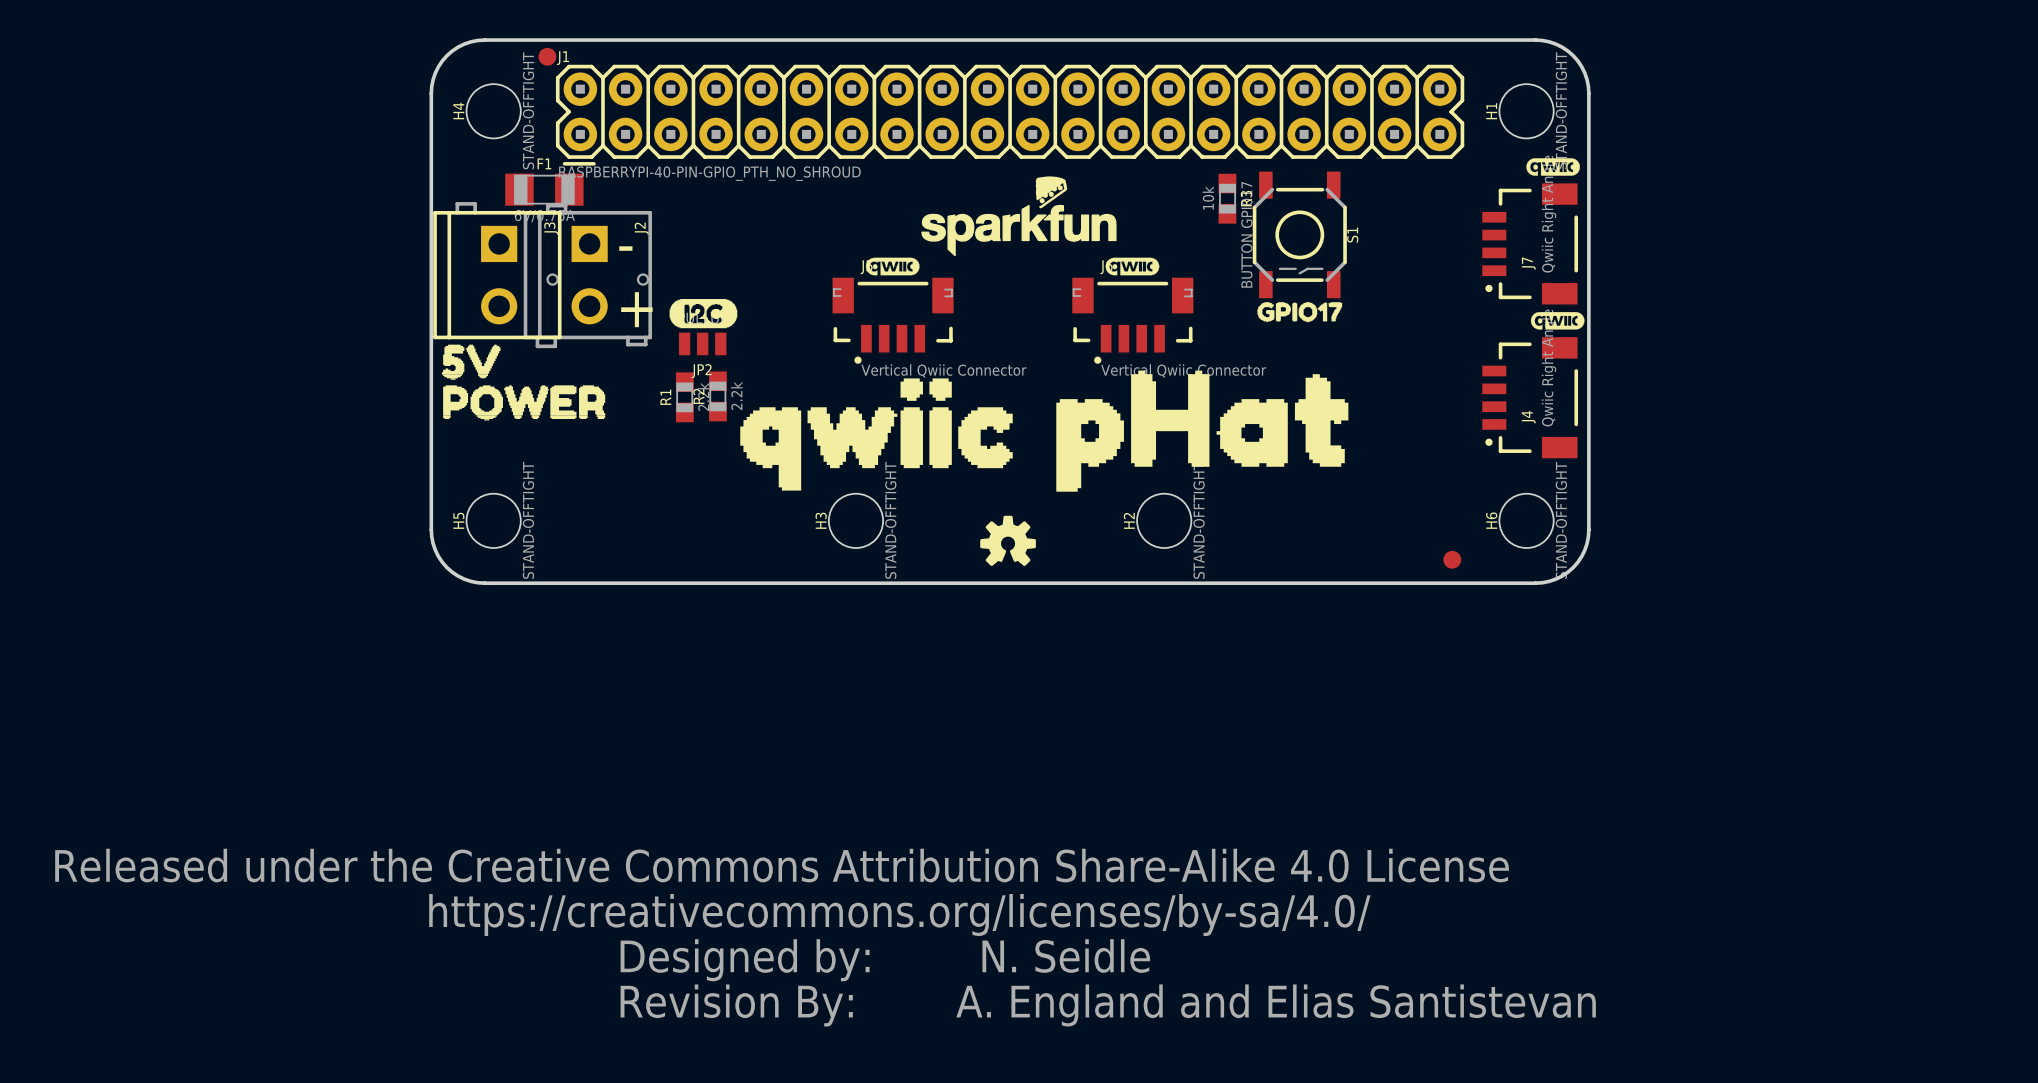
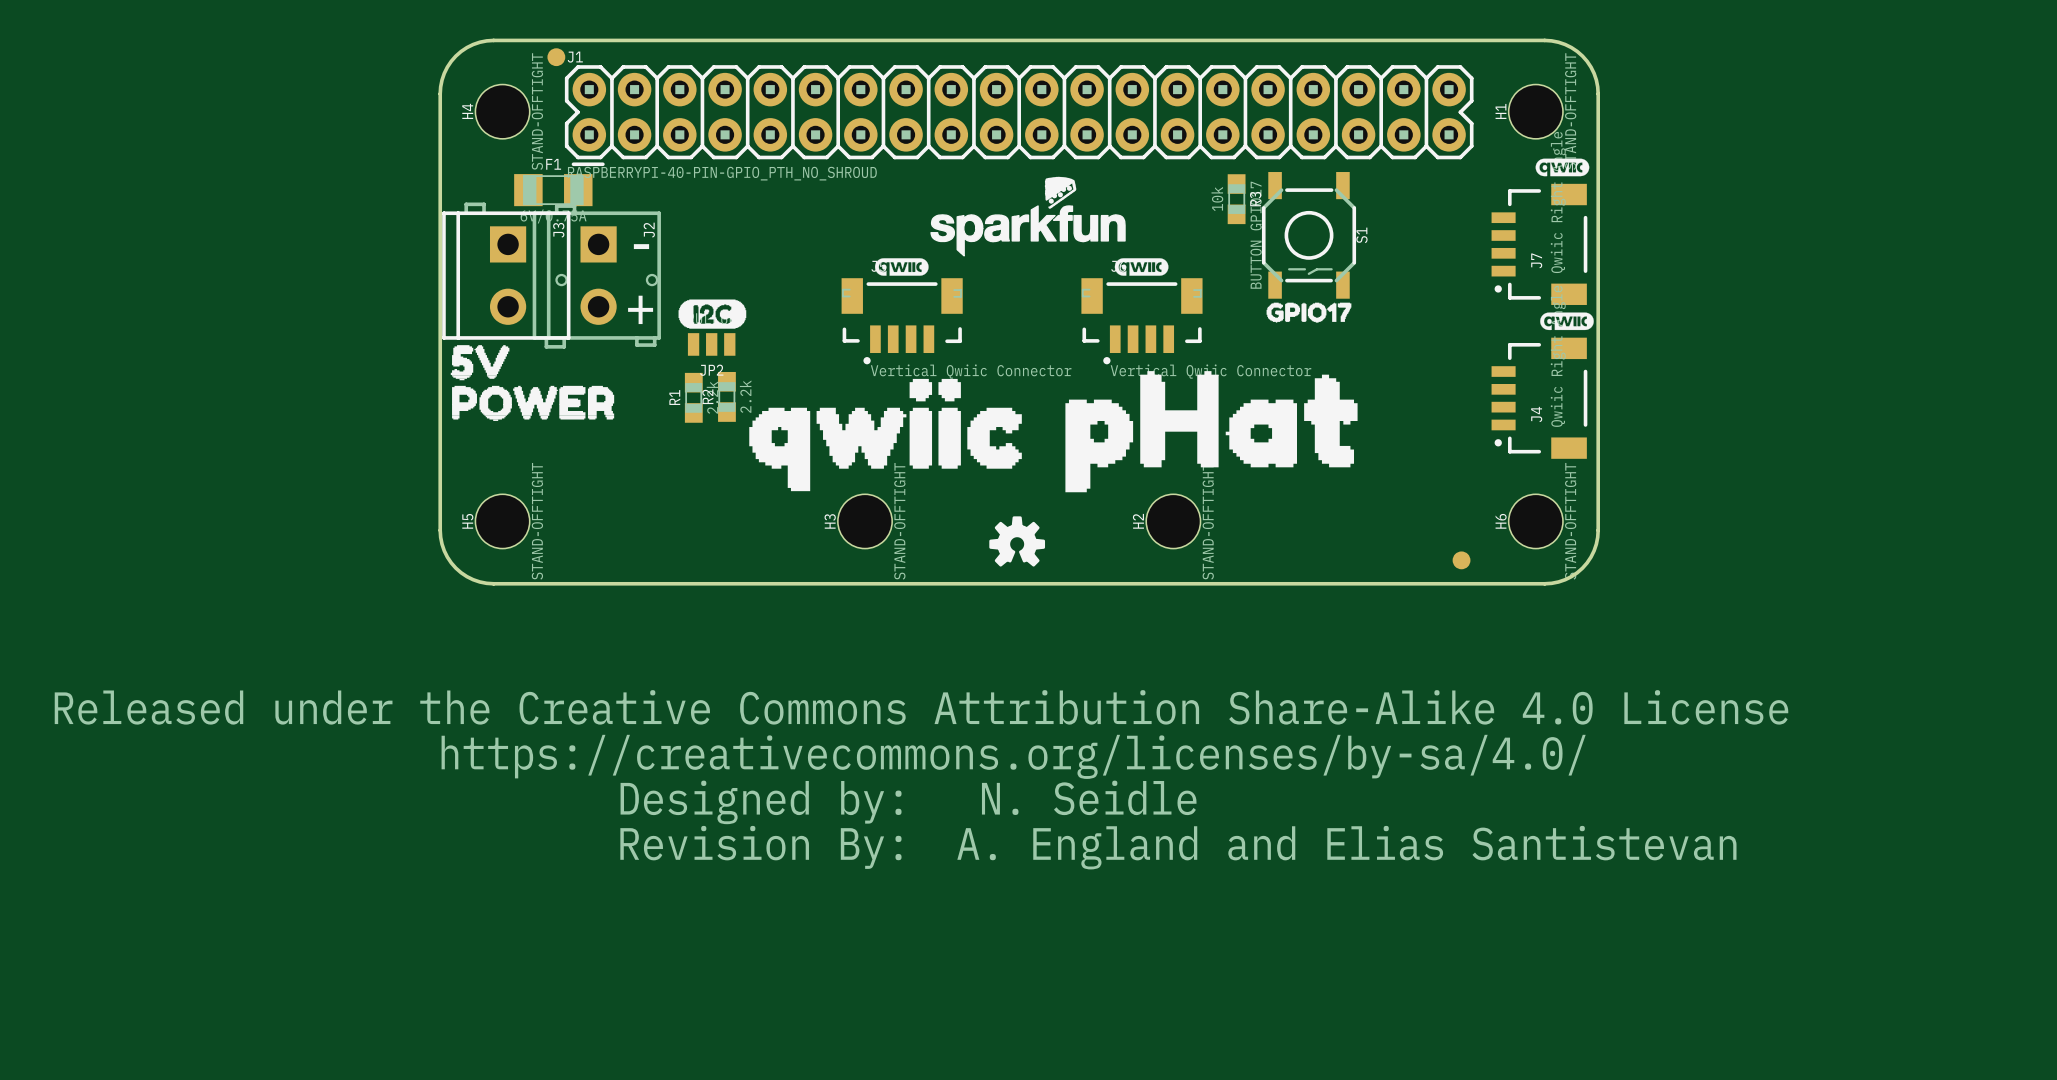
drawing position: (782, 915) -> (921, 757)
text position: N. Seidle (1066, 956) -> N. Seidle (1089, 797)
drawing position: (736, 1005) -> (760, 847)
text position: A. England and Elias Santistevan (1276, 1005) -> A. England and Elias Santistevan (1346, 847)

